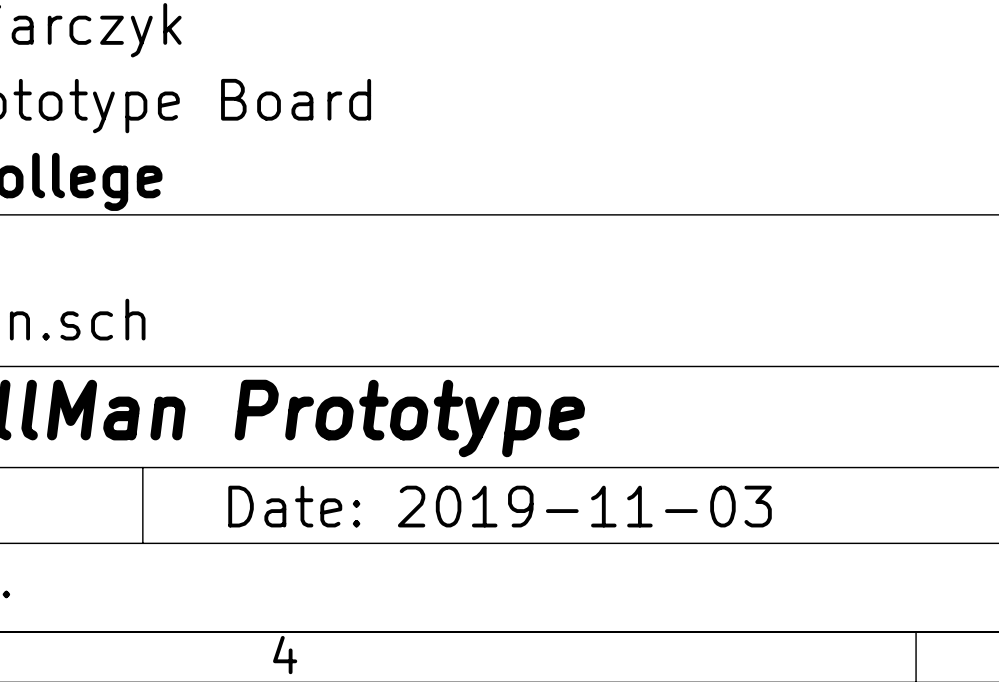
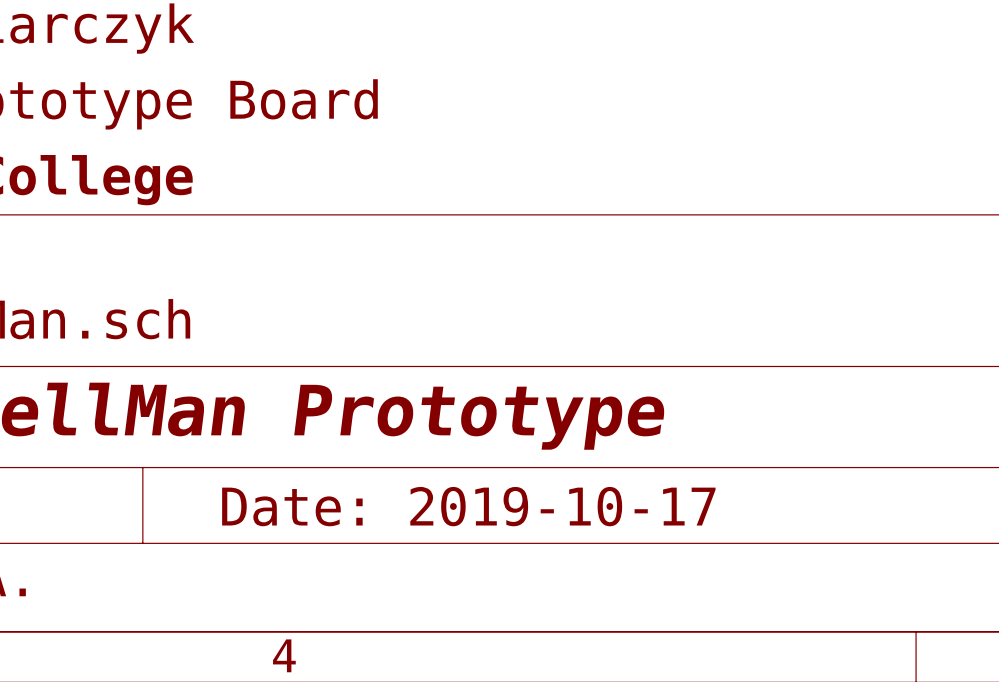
title block: Date: 2019-11-03 (500, 506) -> Date: 2019-10-17 (468, 506)

